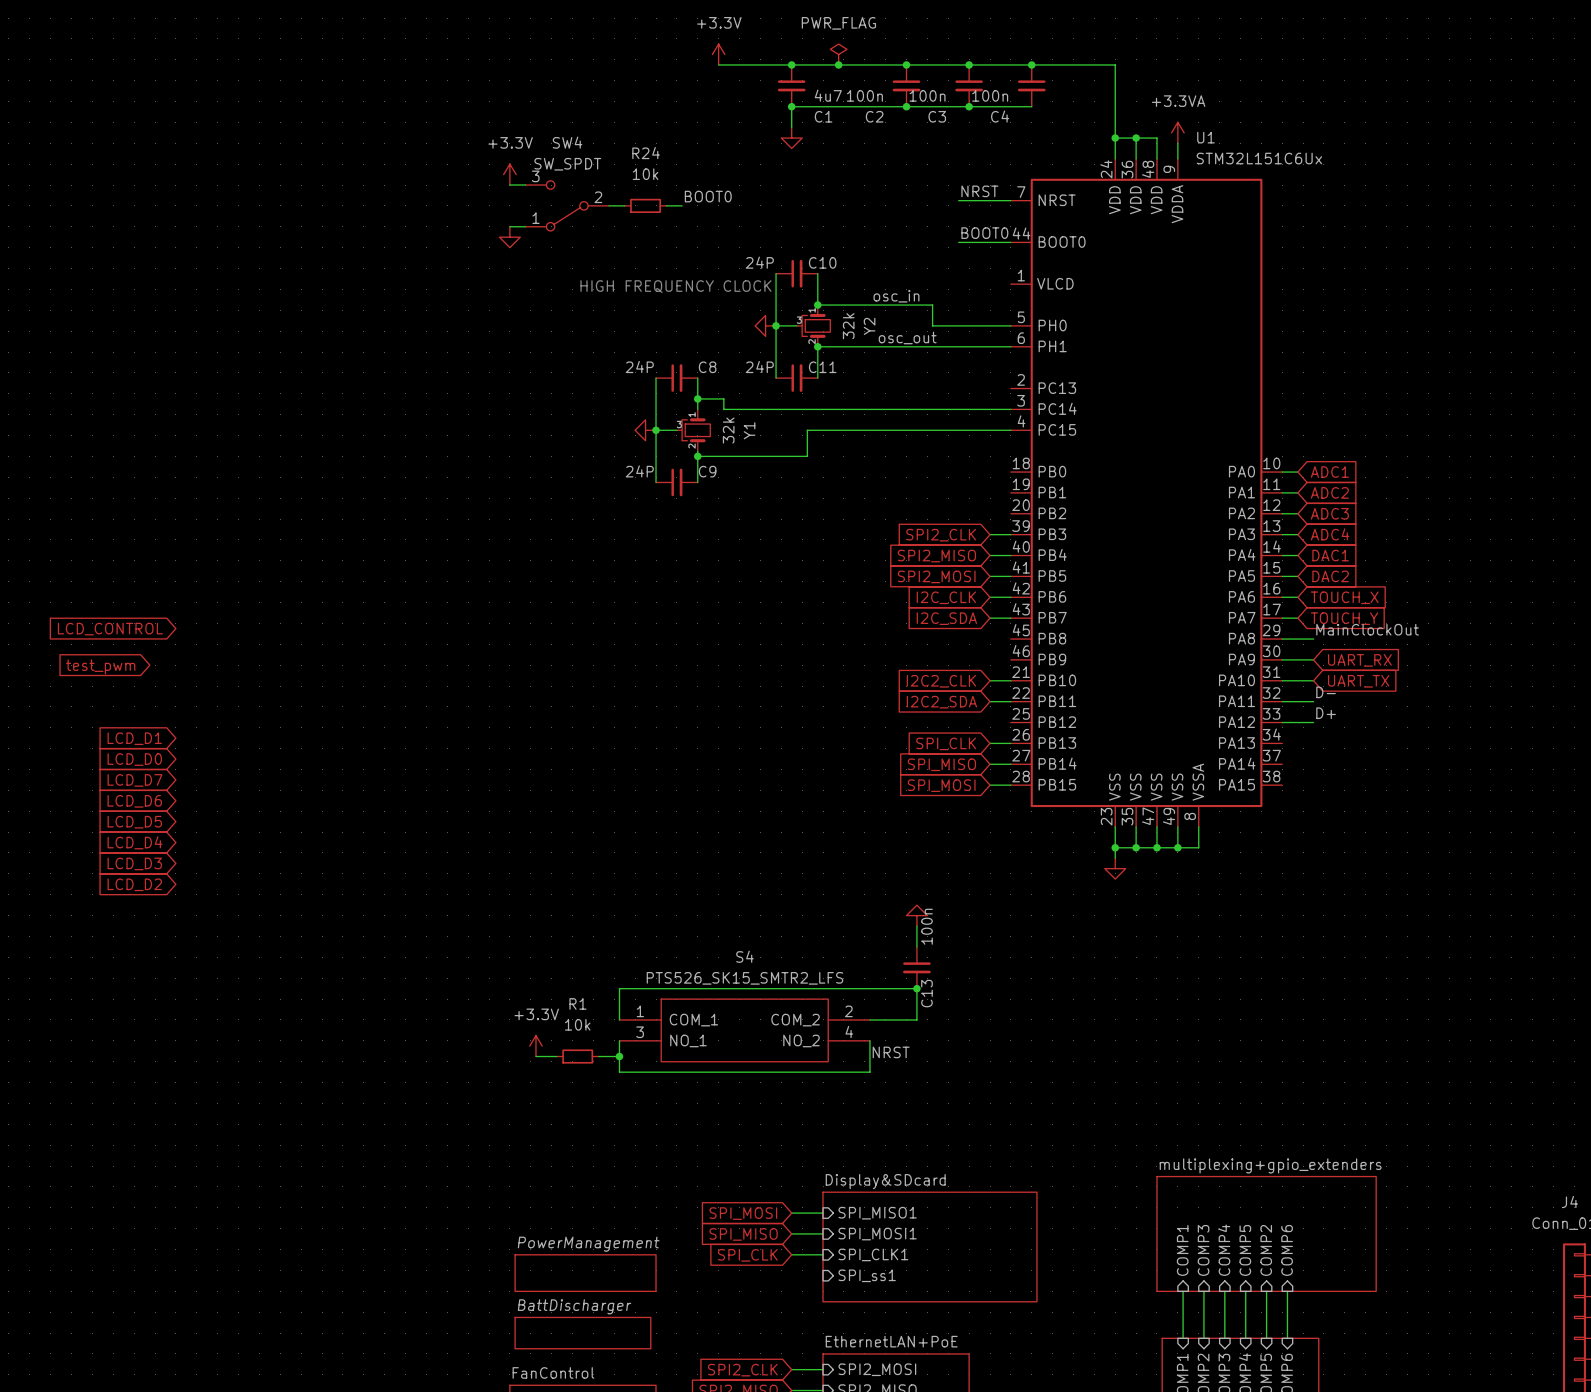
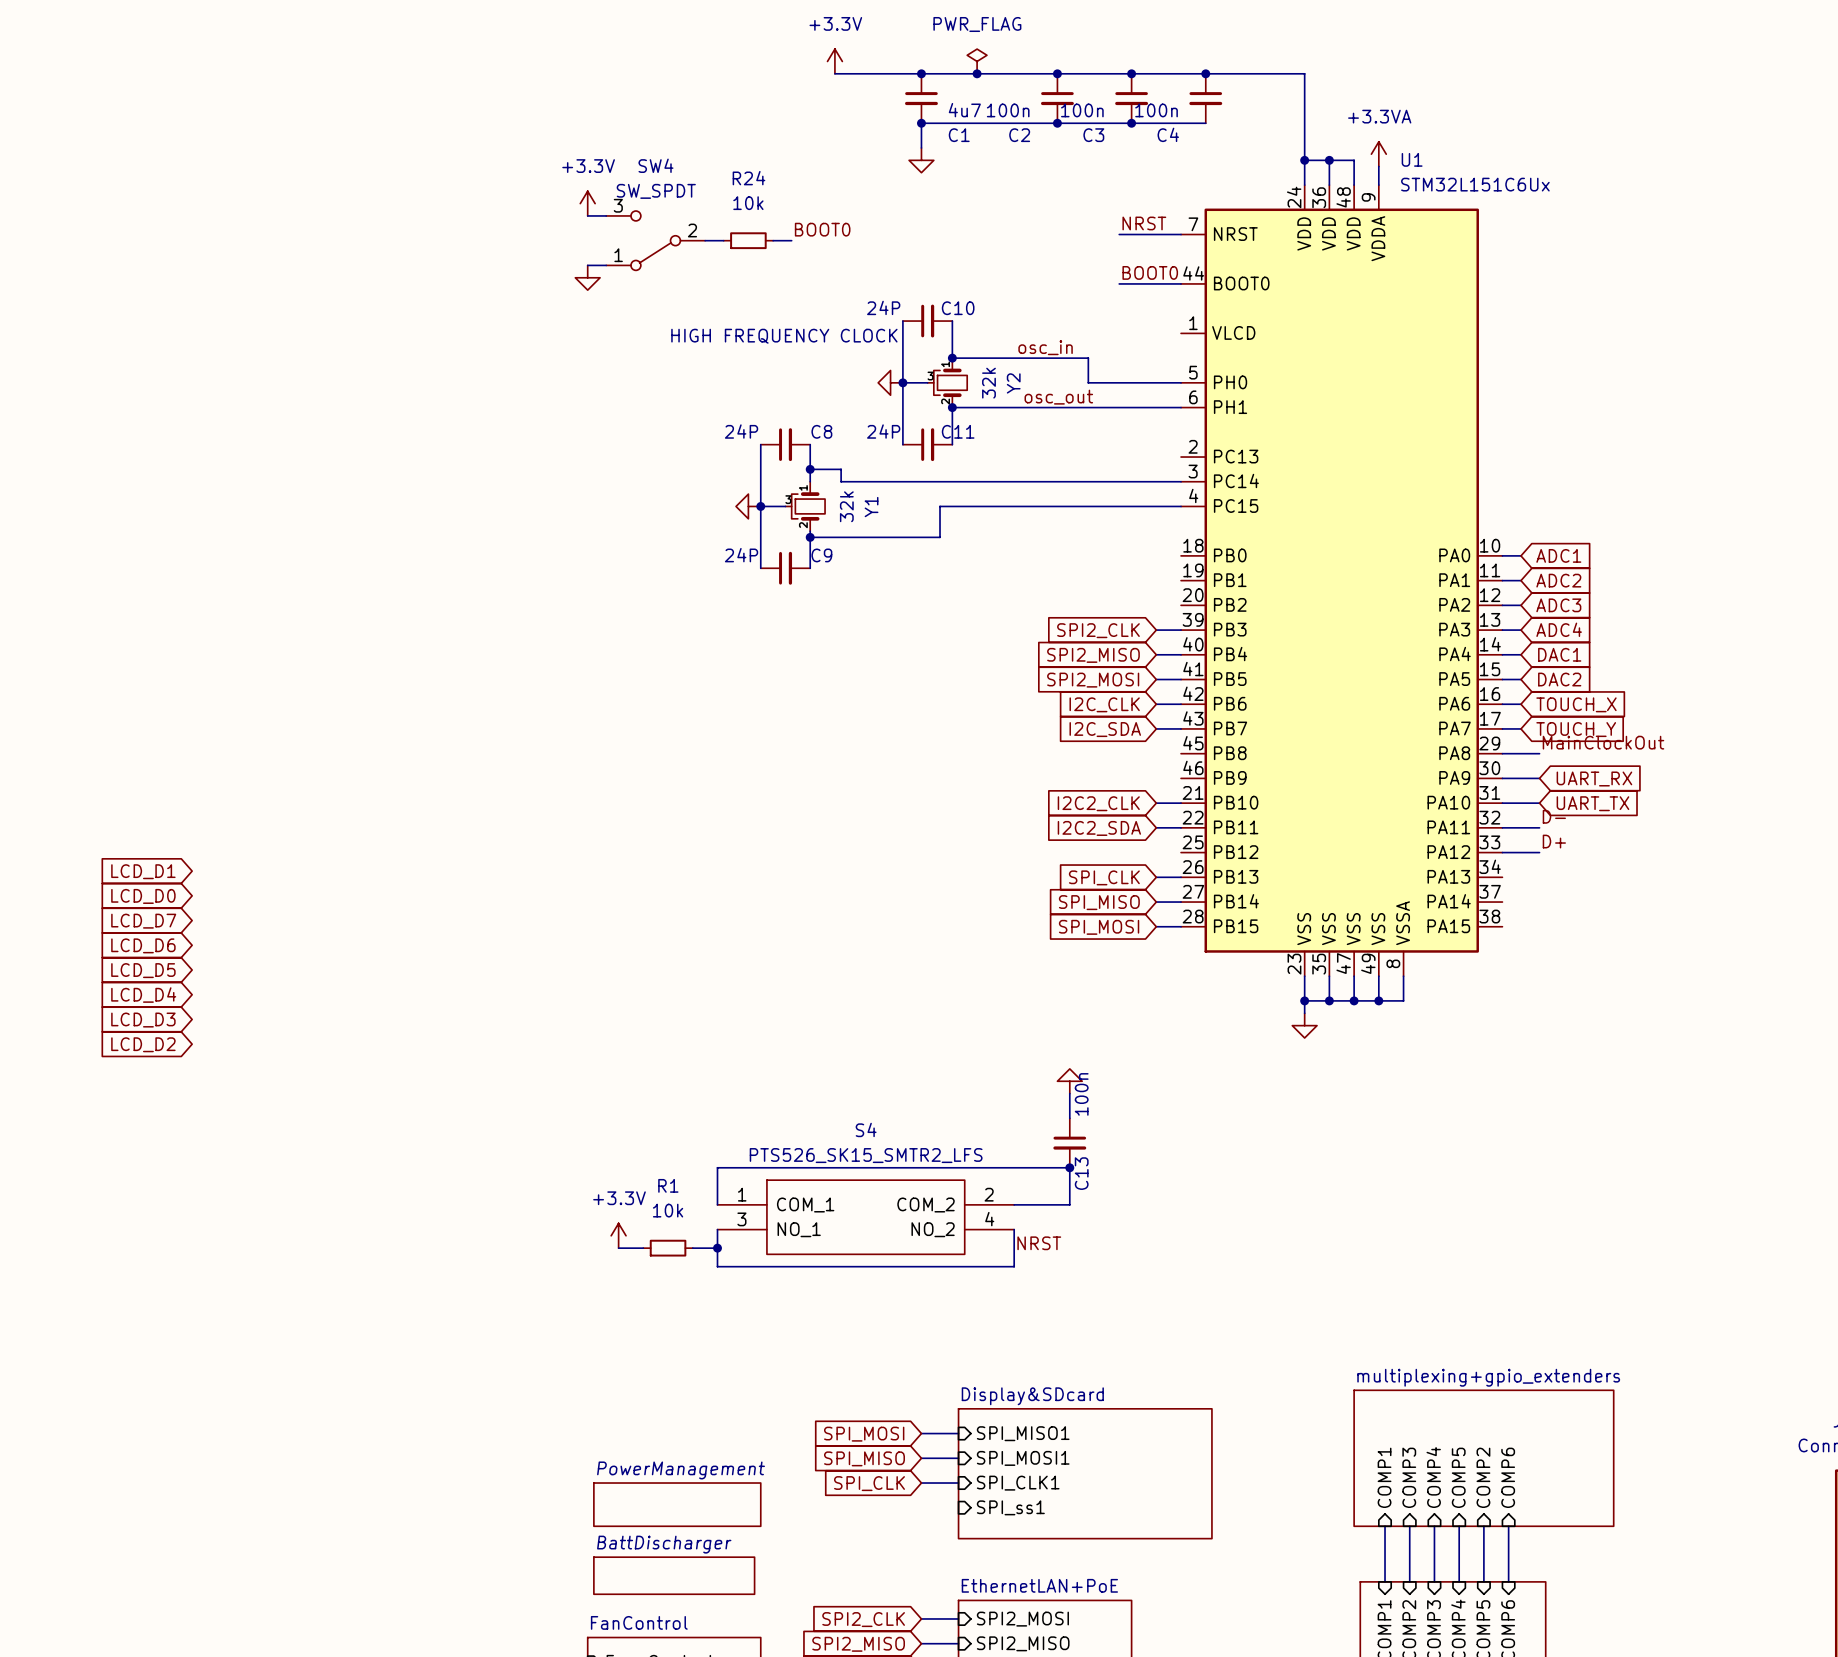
global label: LCD_CONTROL (110, 629) -> none
global label: test_pwm (100, 666) -> none

